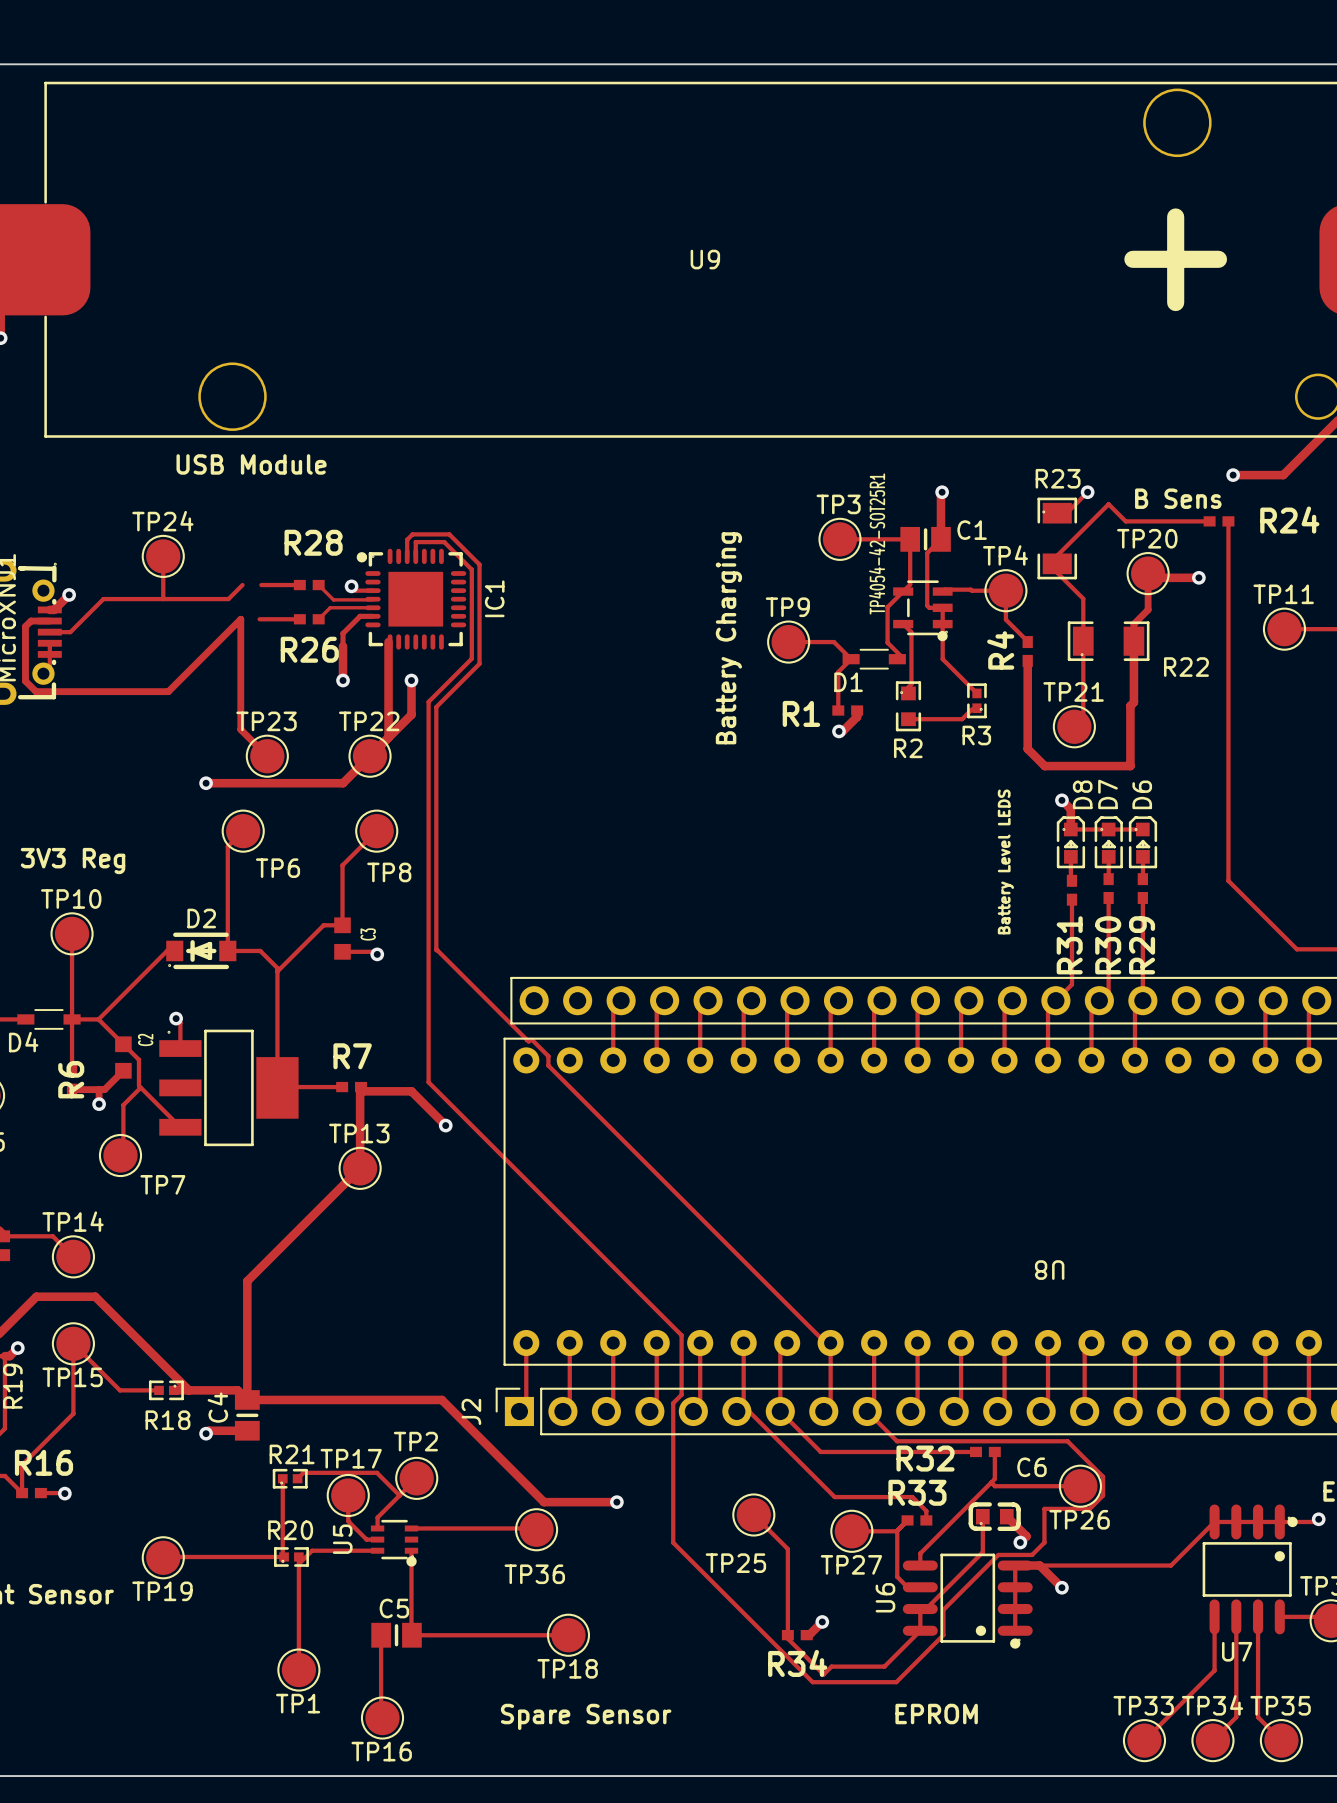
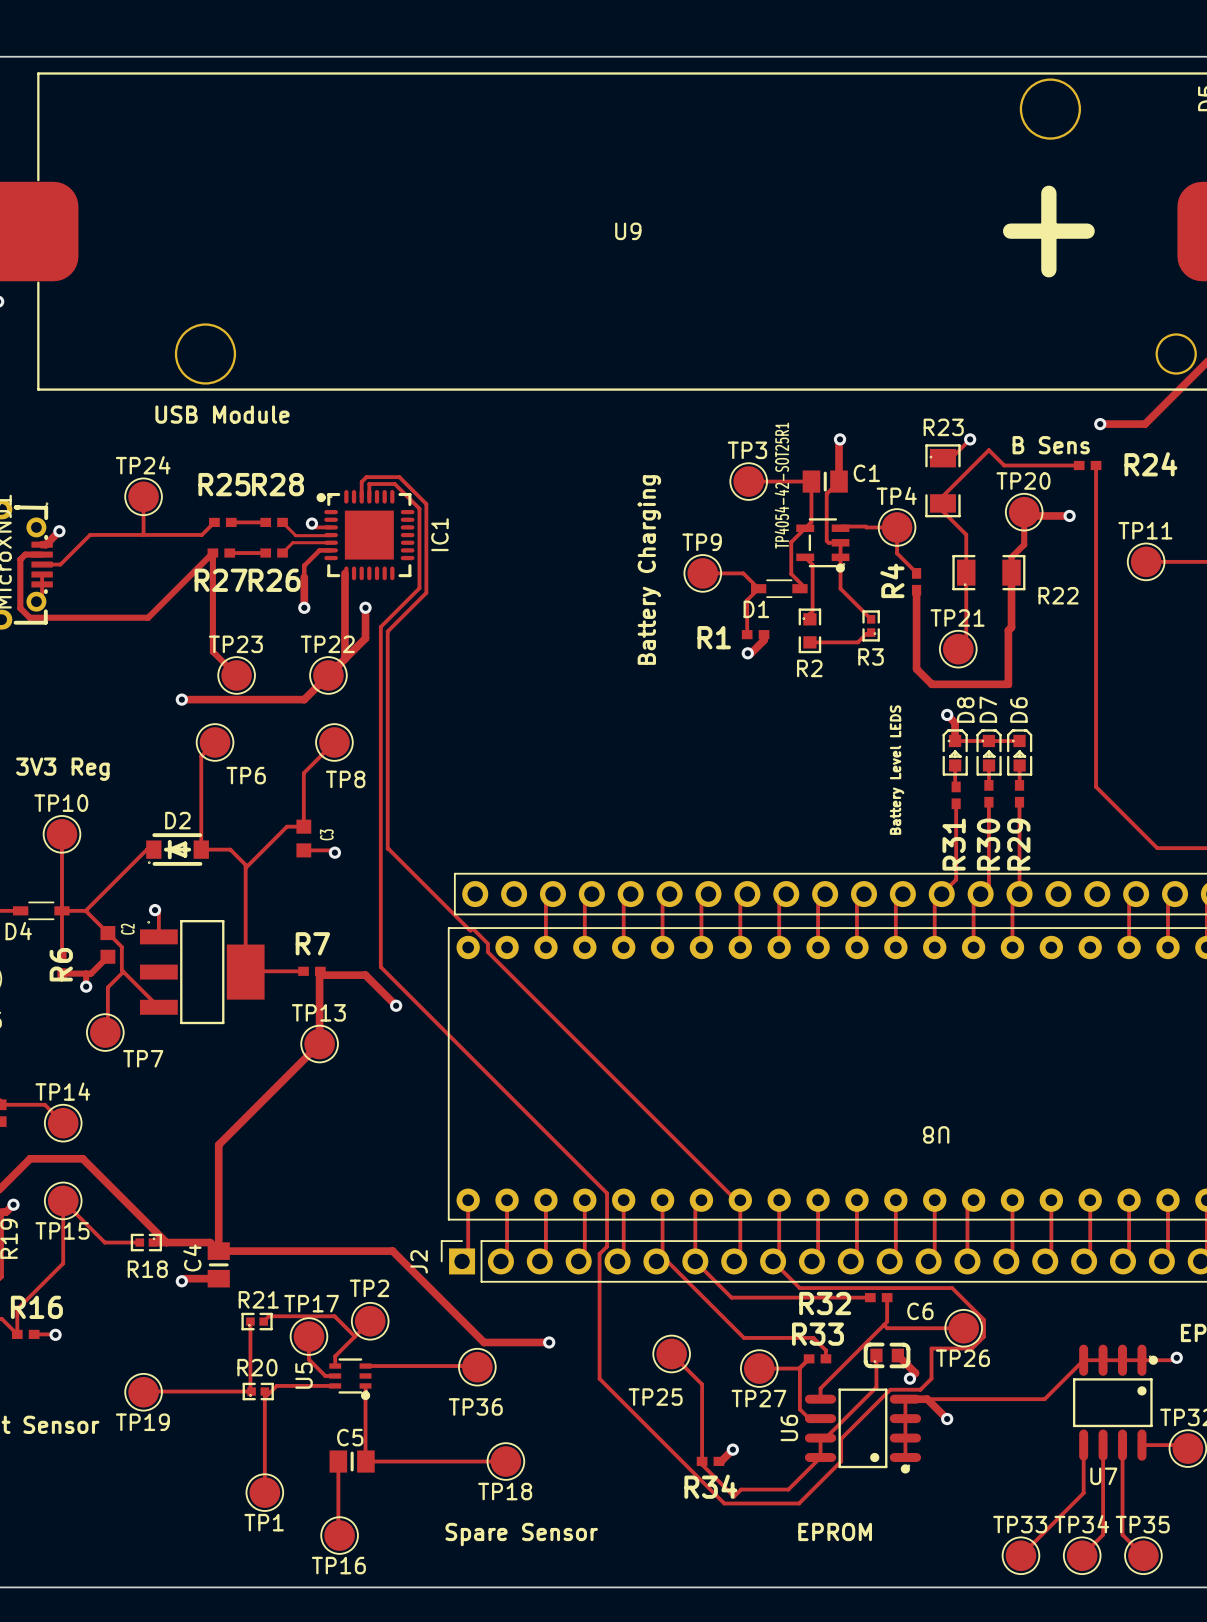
R27: none -> (222, 522)
R25: none -> (221, 553)

